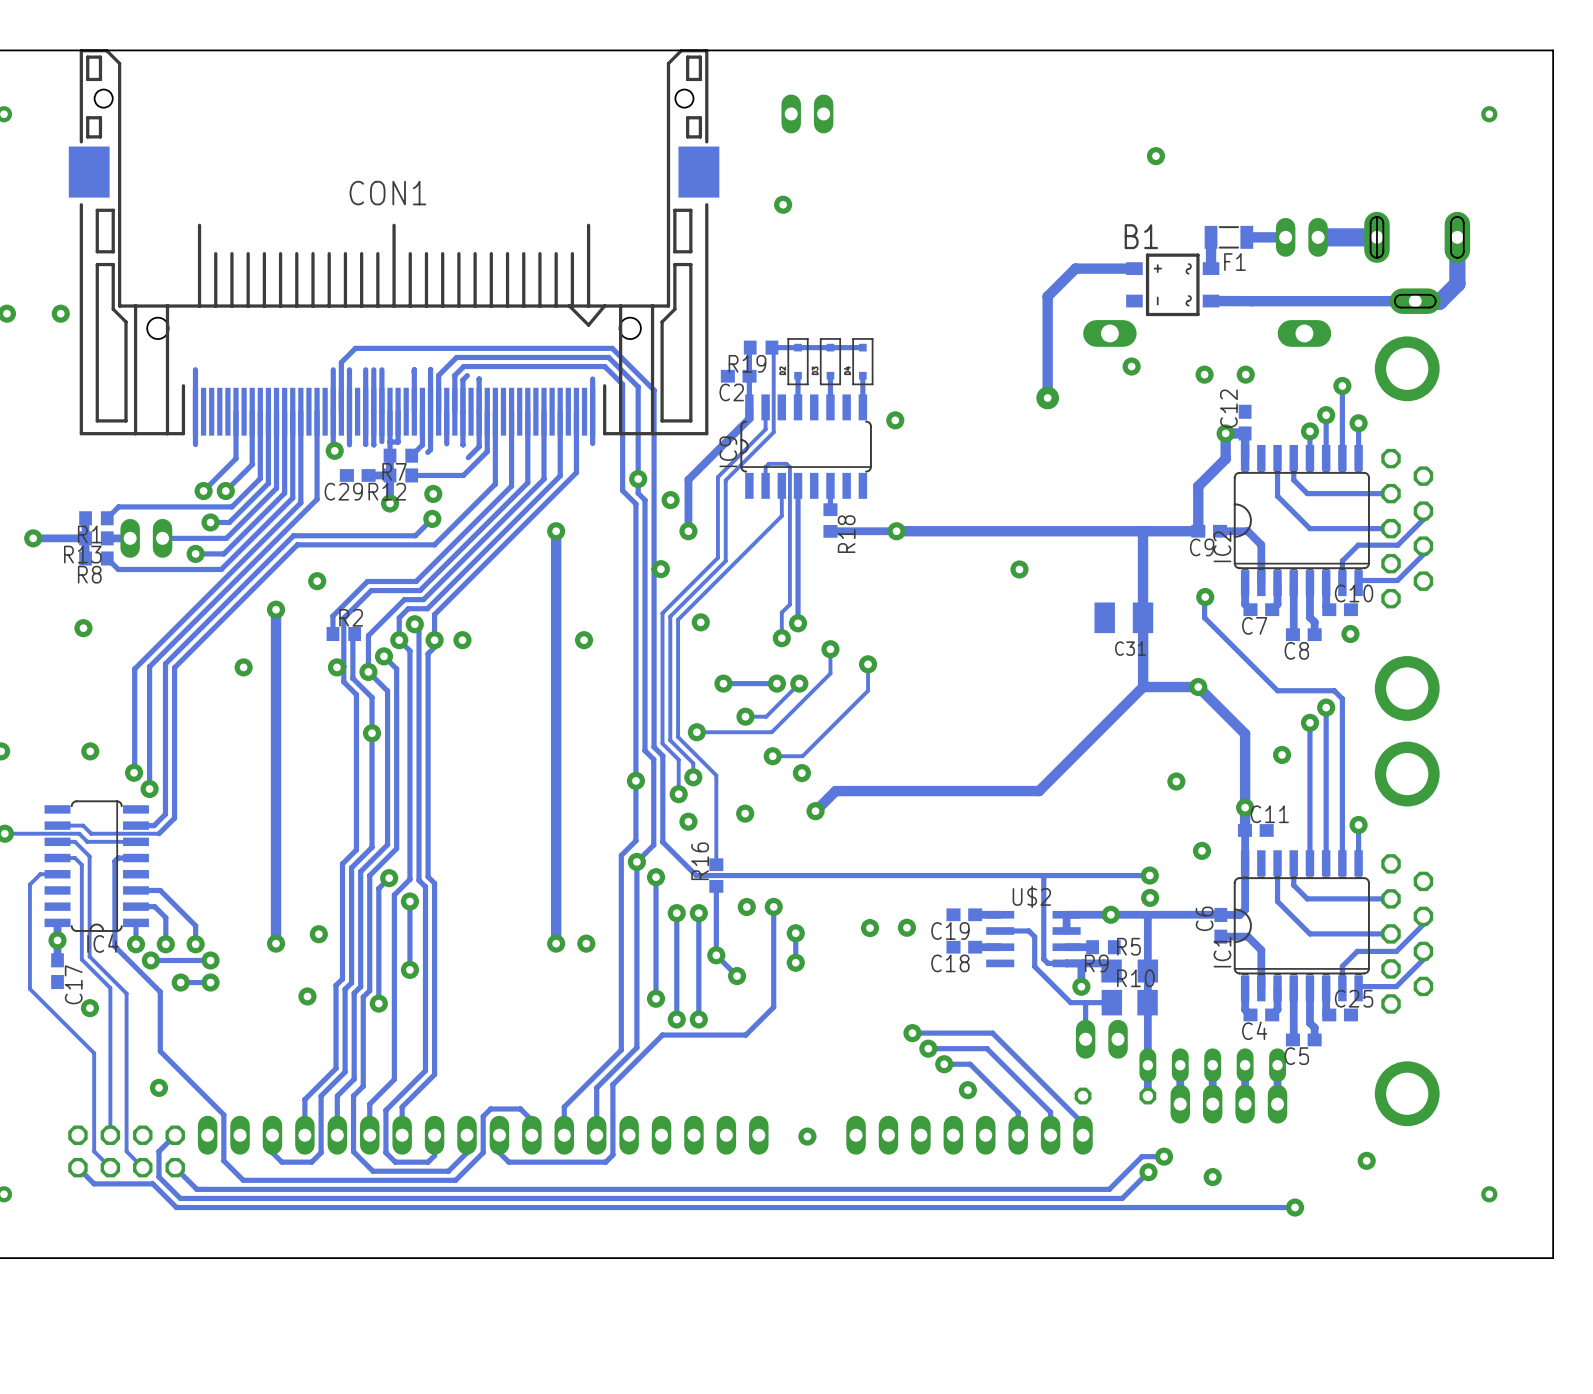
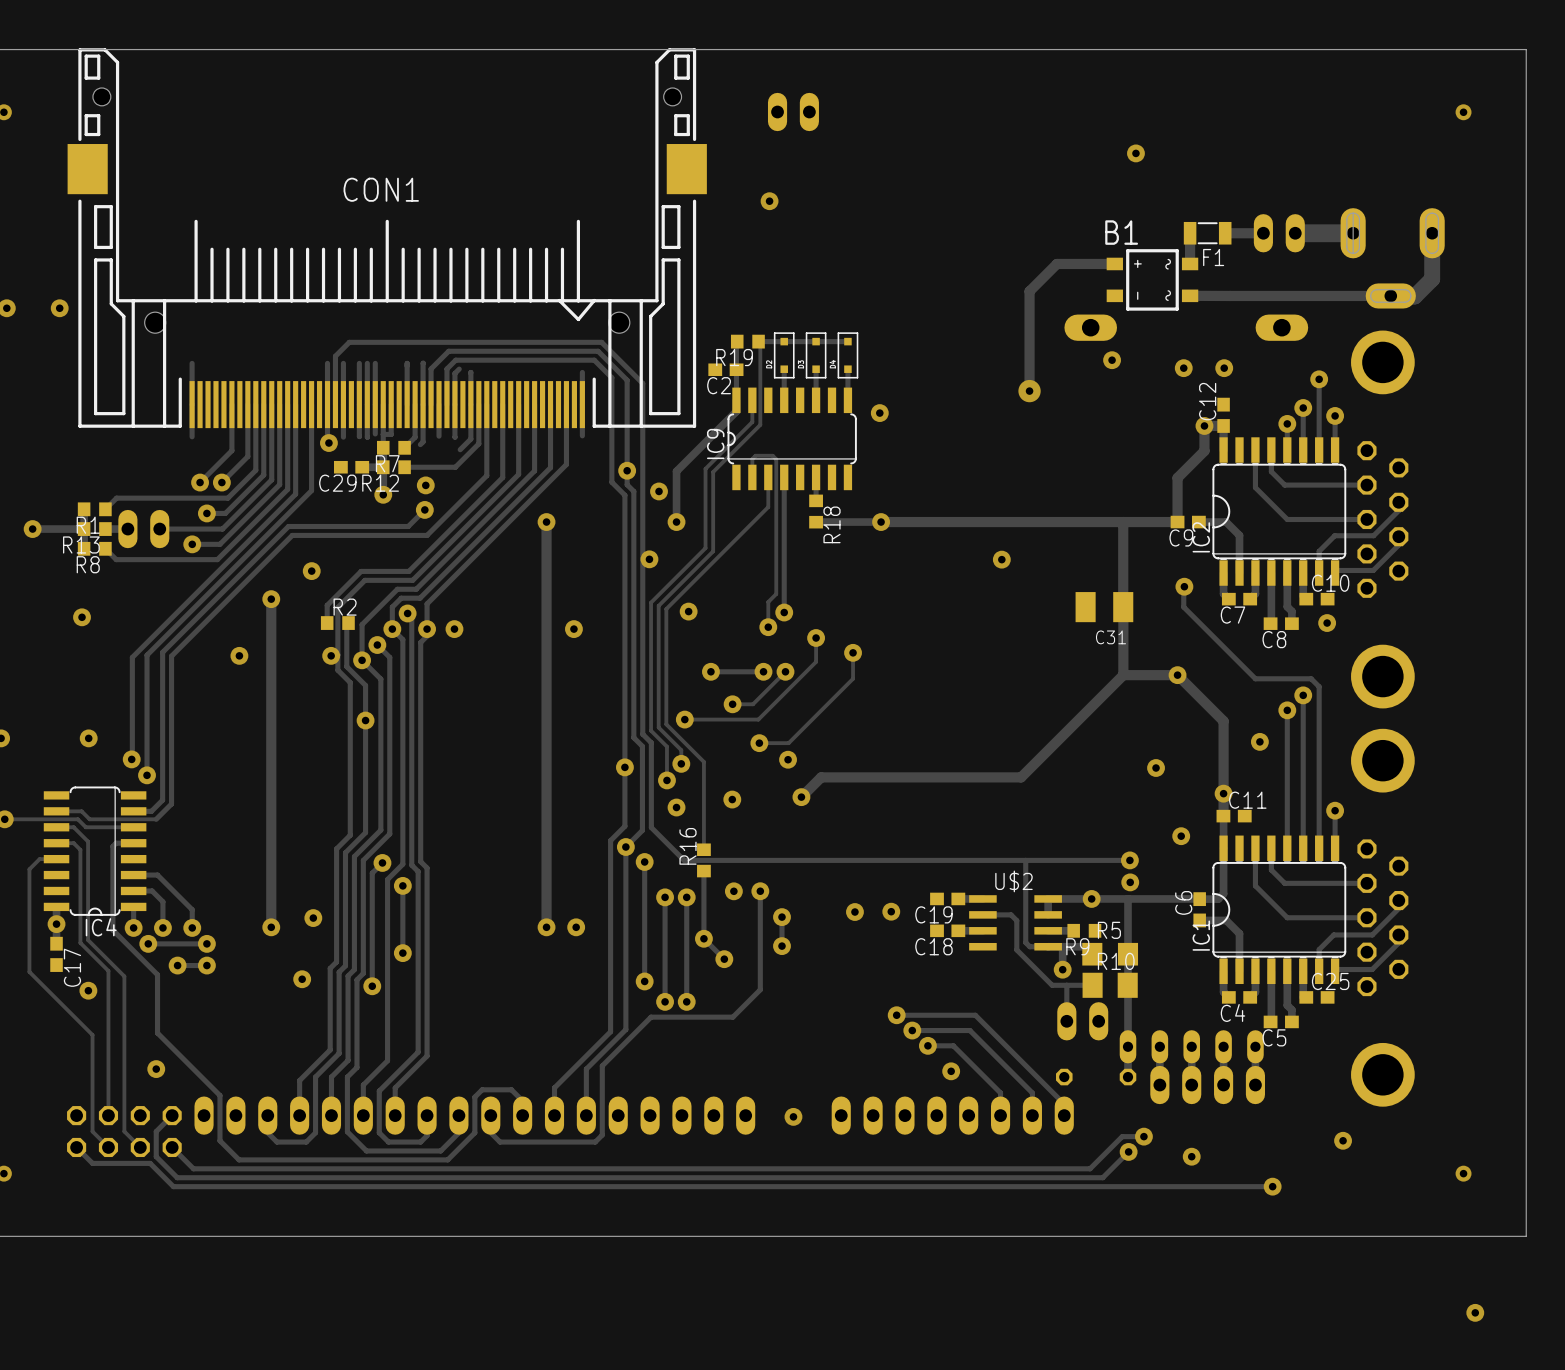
via: none -> (1475, 1312)

